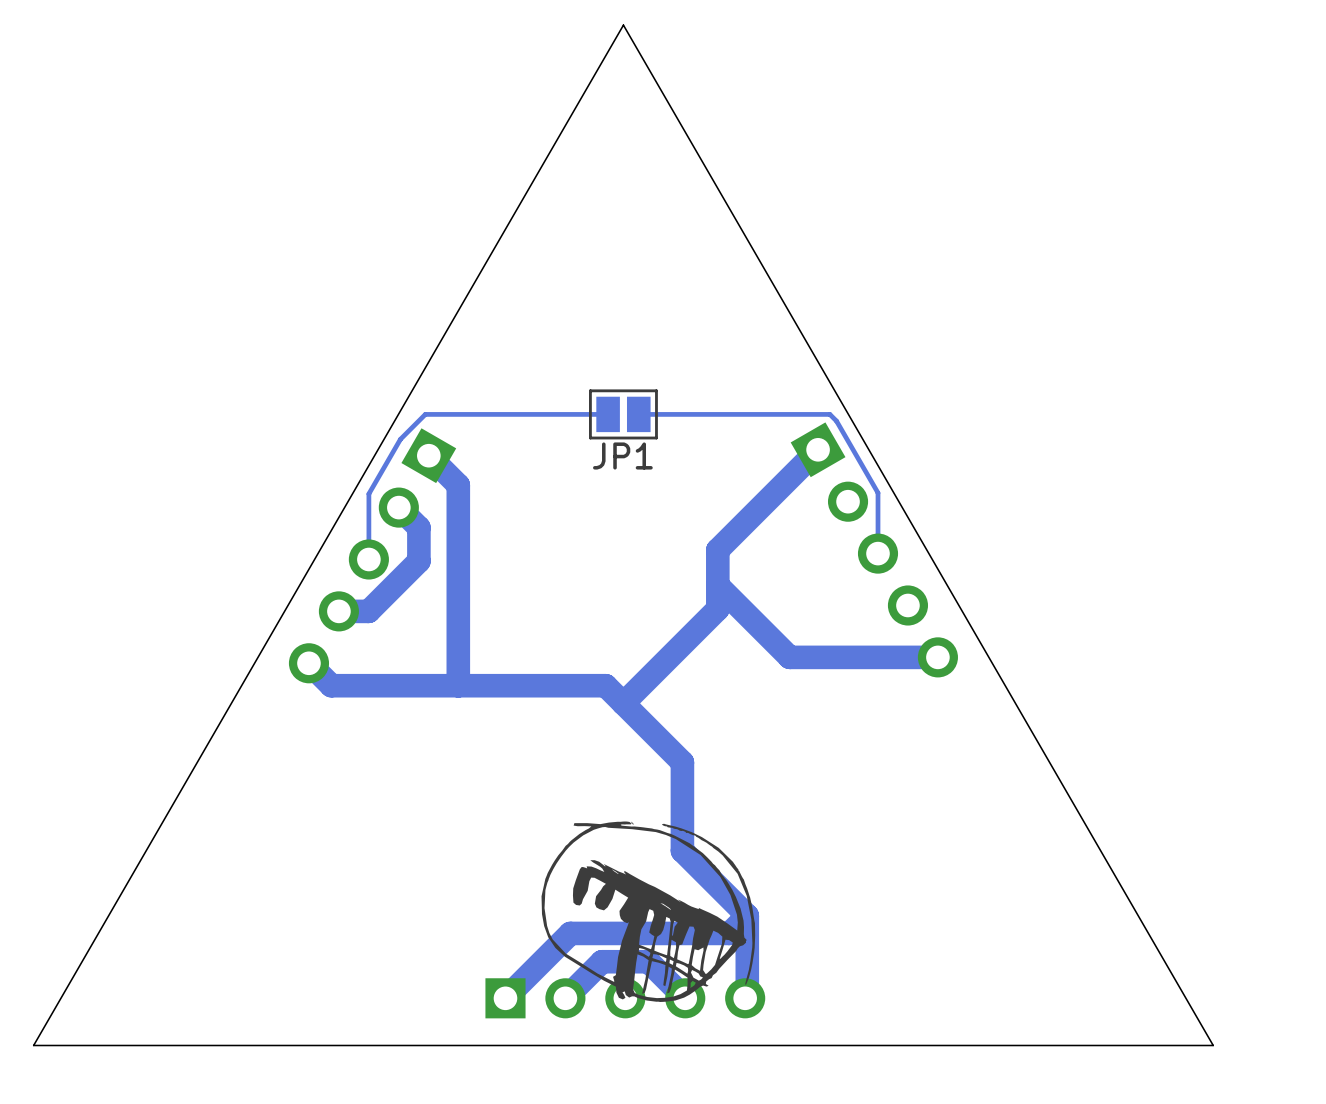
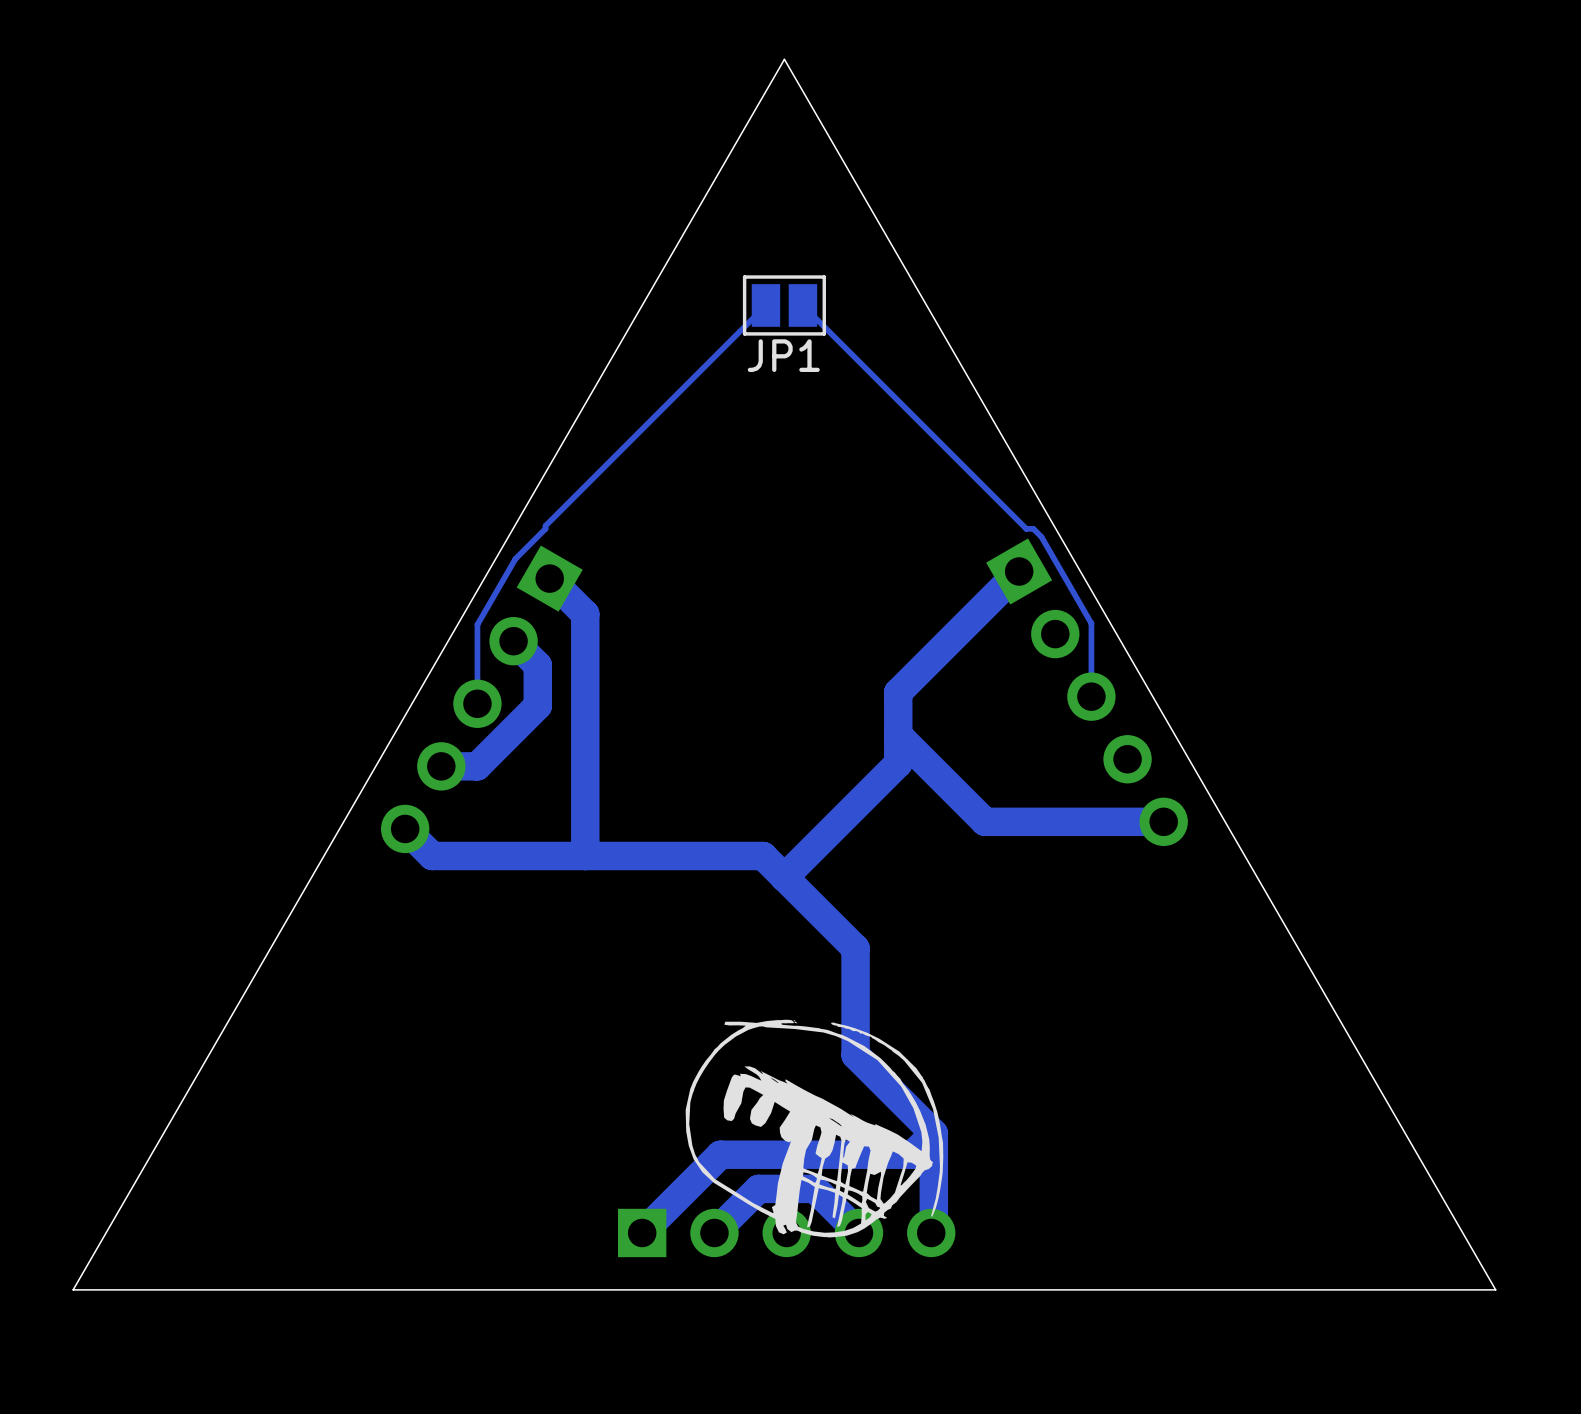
track: (608, 414) (425, 414) -> (765, 305) (545, 525) (545, 528)
JP1 position: (623, 414) -> (784, 305)
track: (823, 414) (638, 414) -> (1026, 528) (802, 305)

